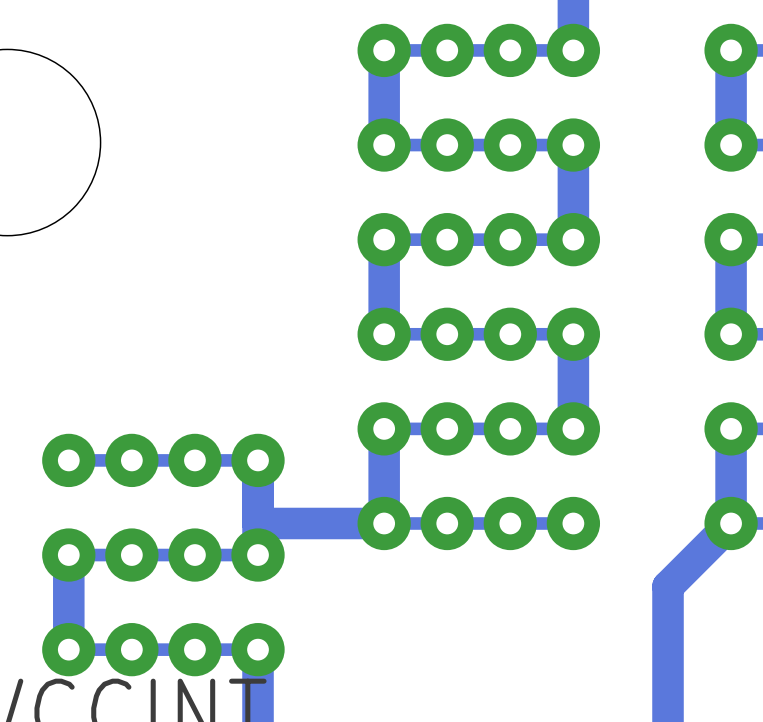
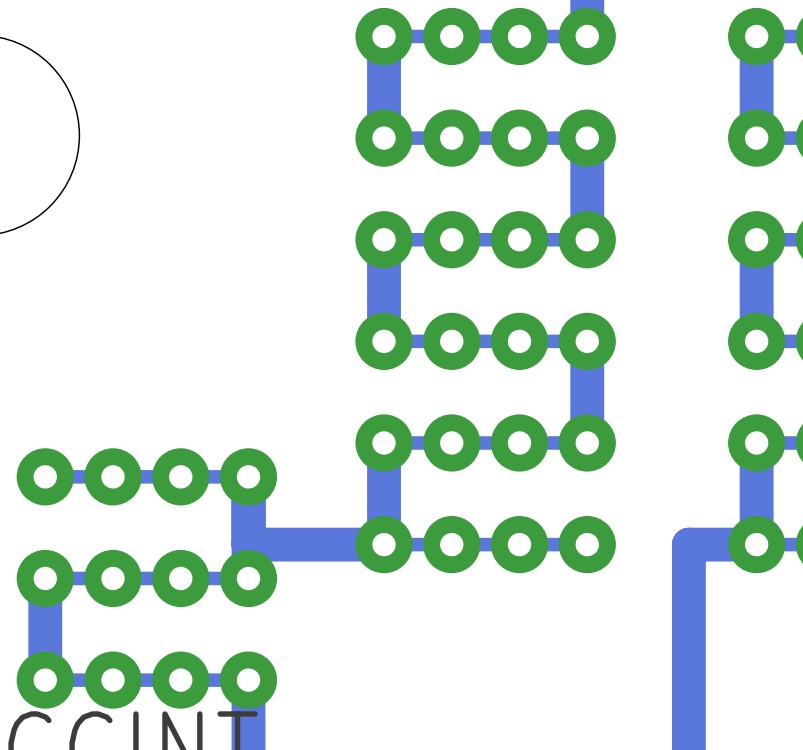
track: (731, 523) (668, 586) -> (756, 544) (688, 544) (688, 612)

